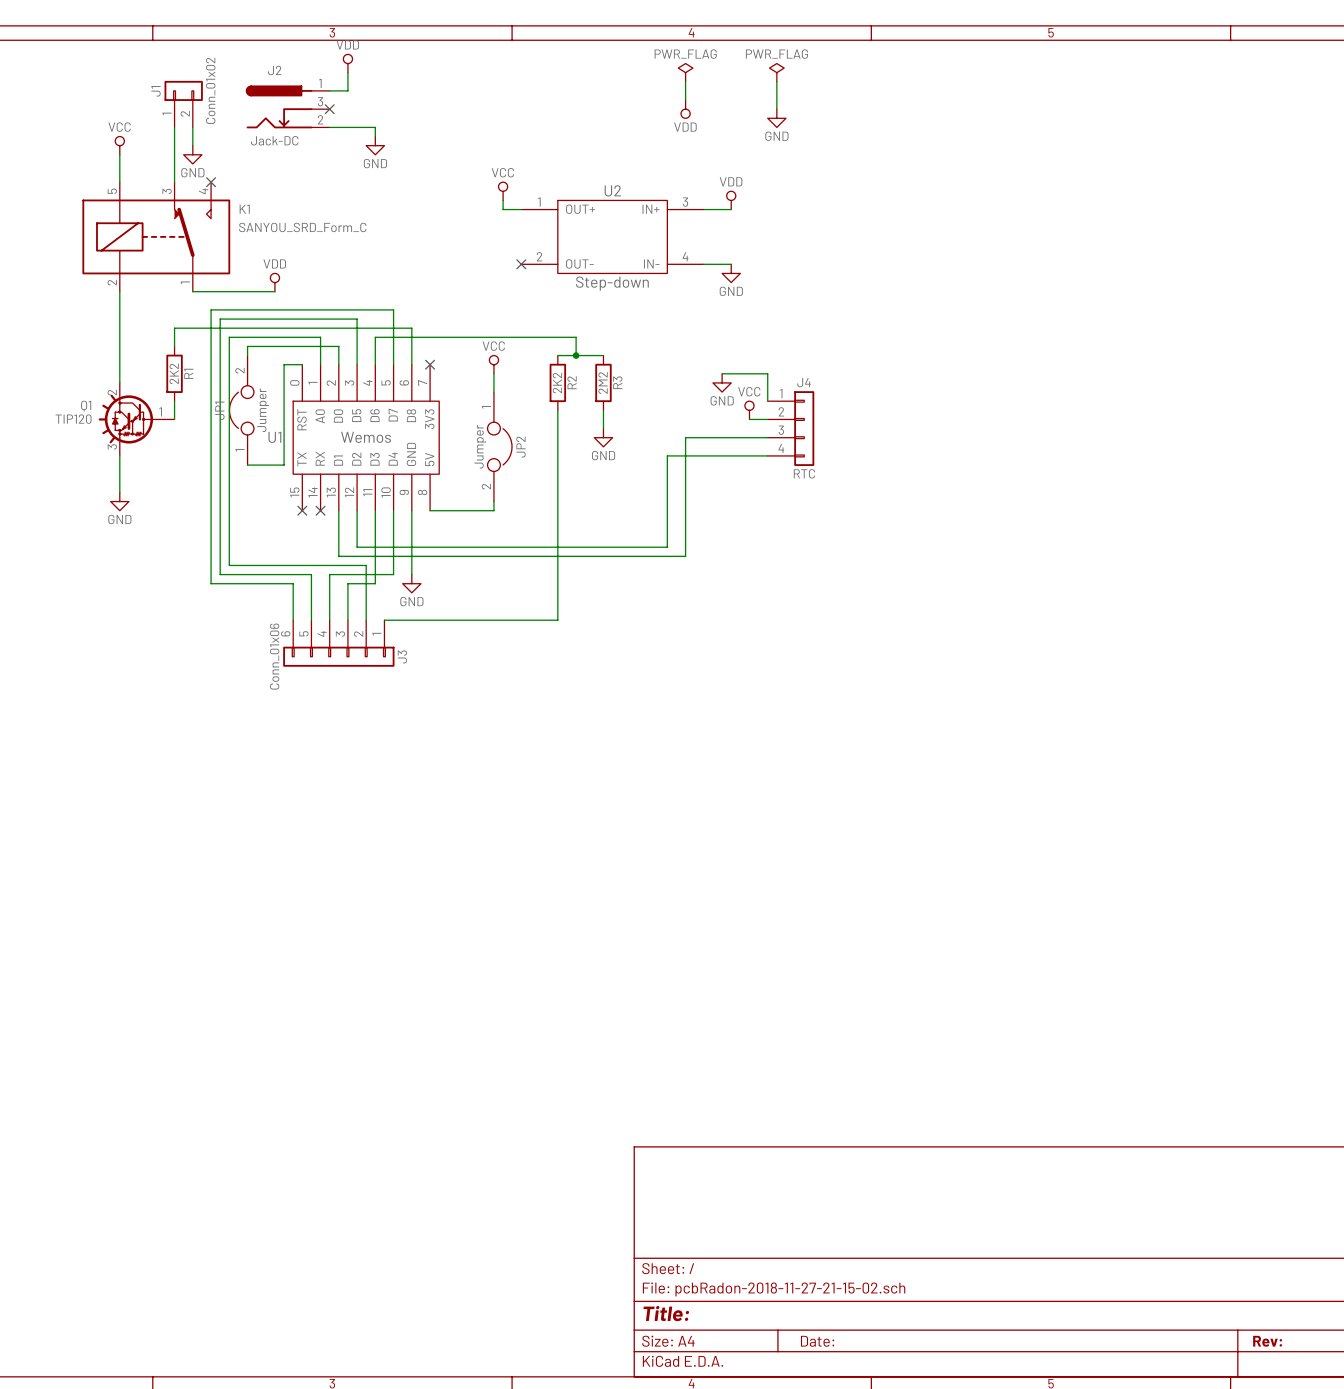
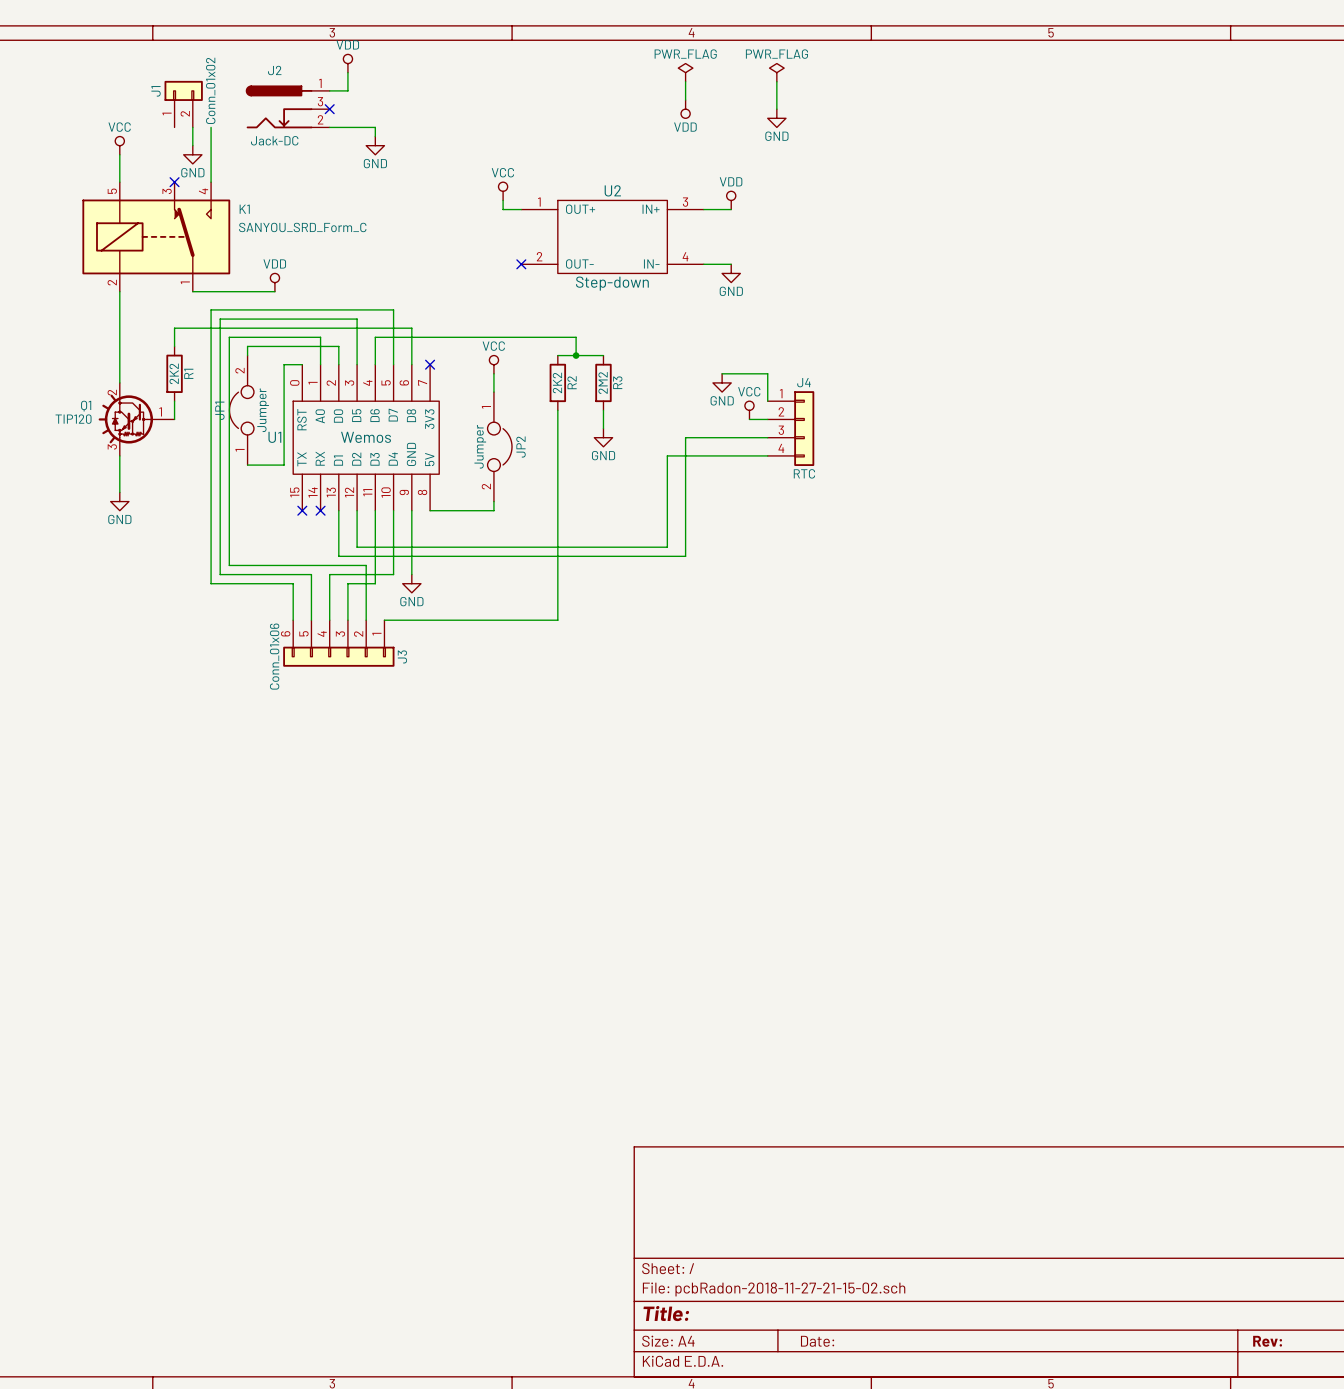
wire: (174, 127) (174, 182) -> (211, 127) (211, 182)
no-connect mark position: (211, 182) -> (174, 182)

